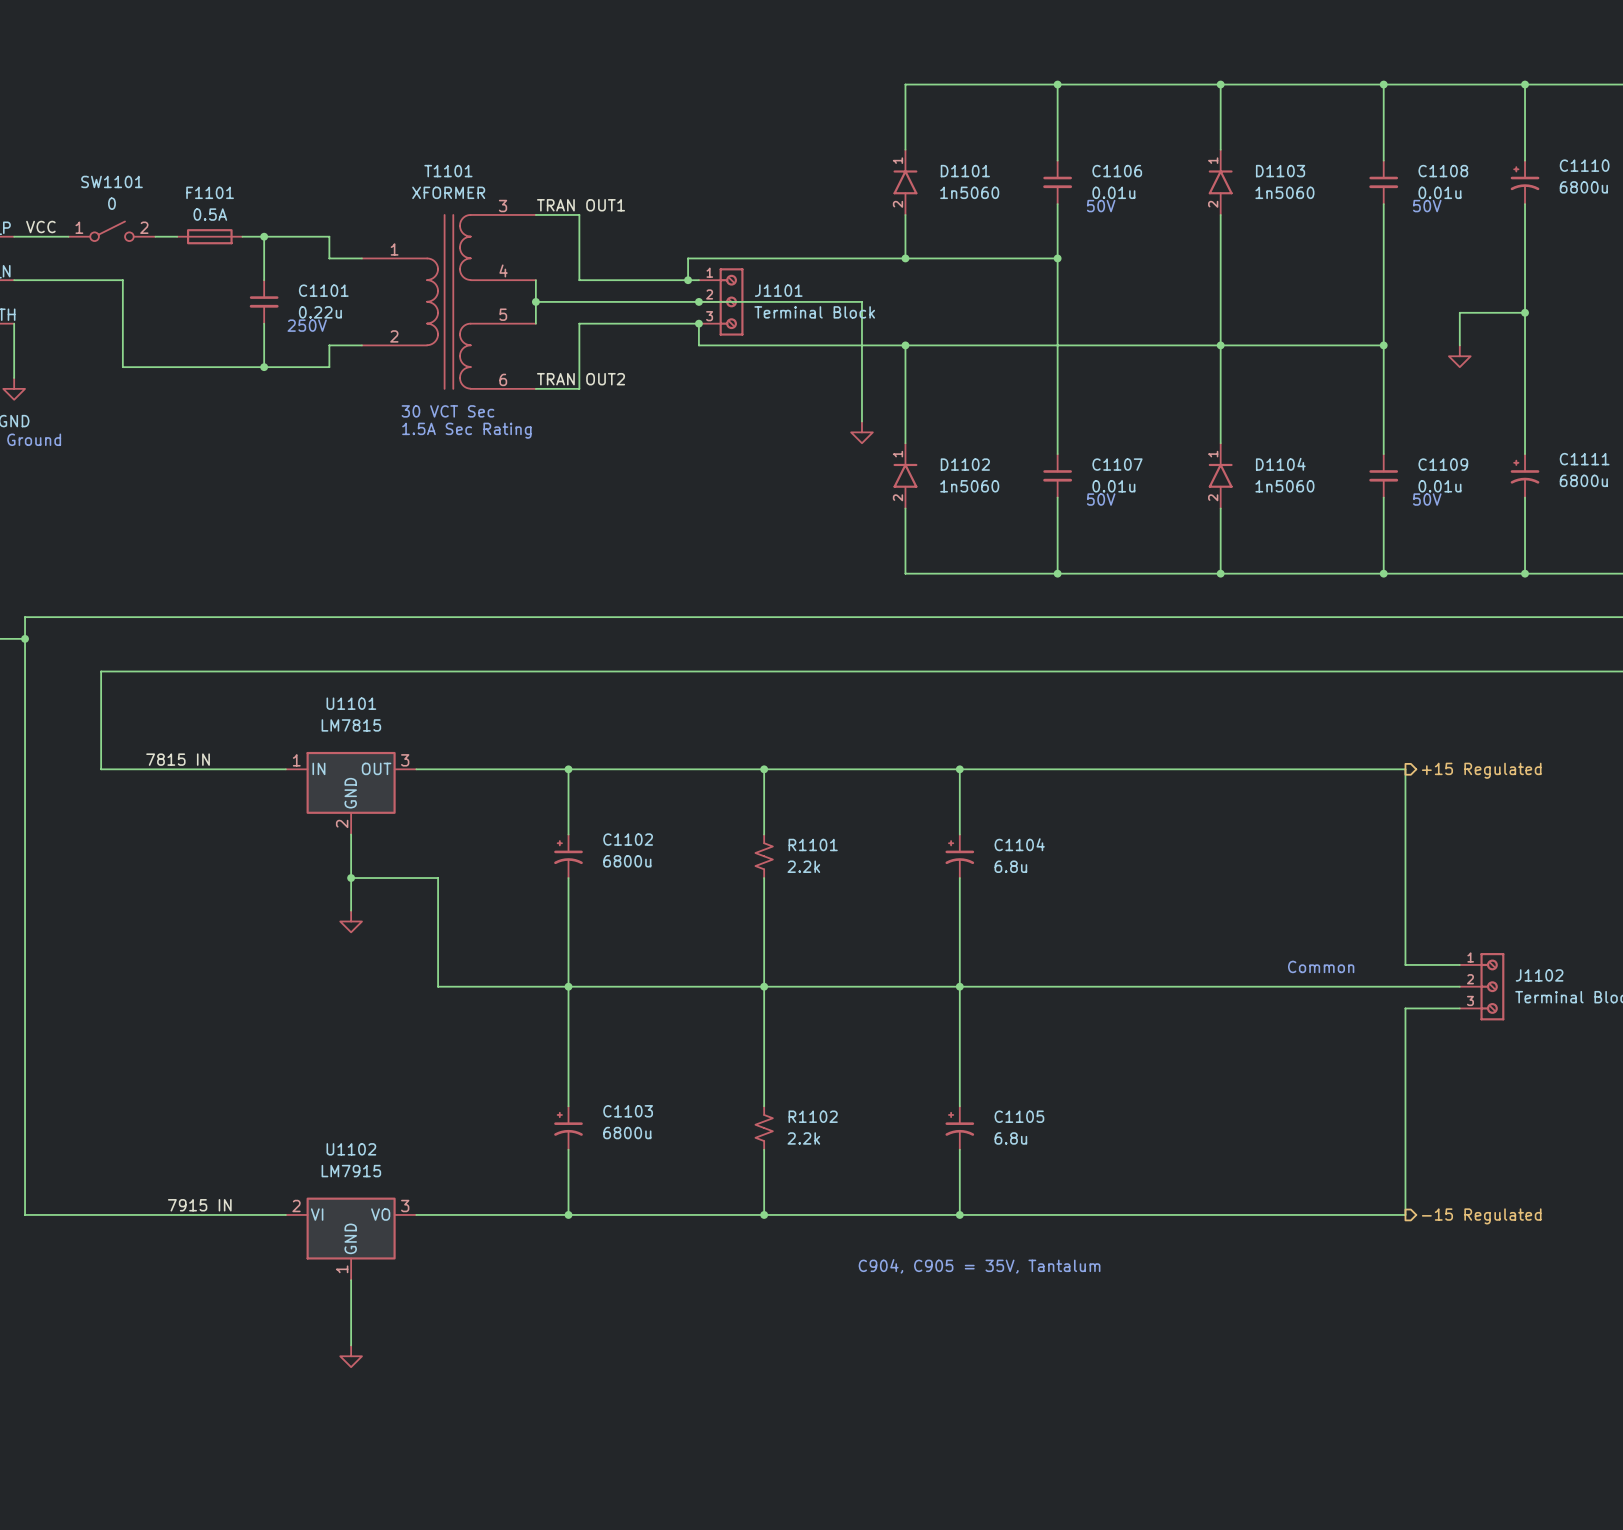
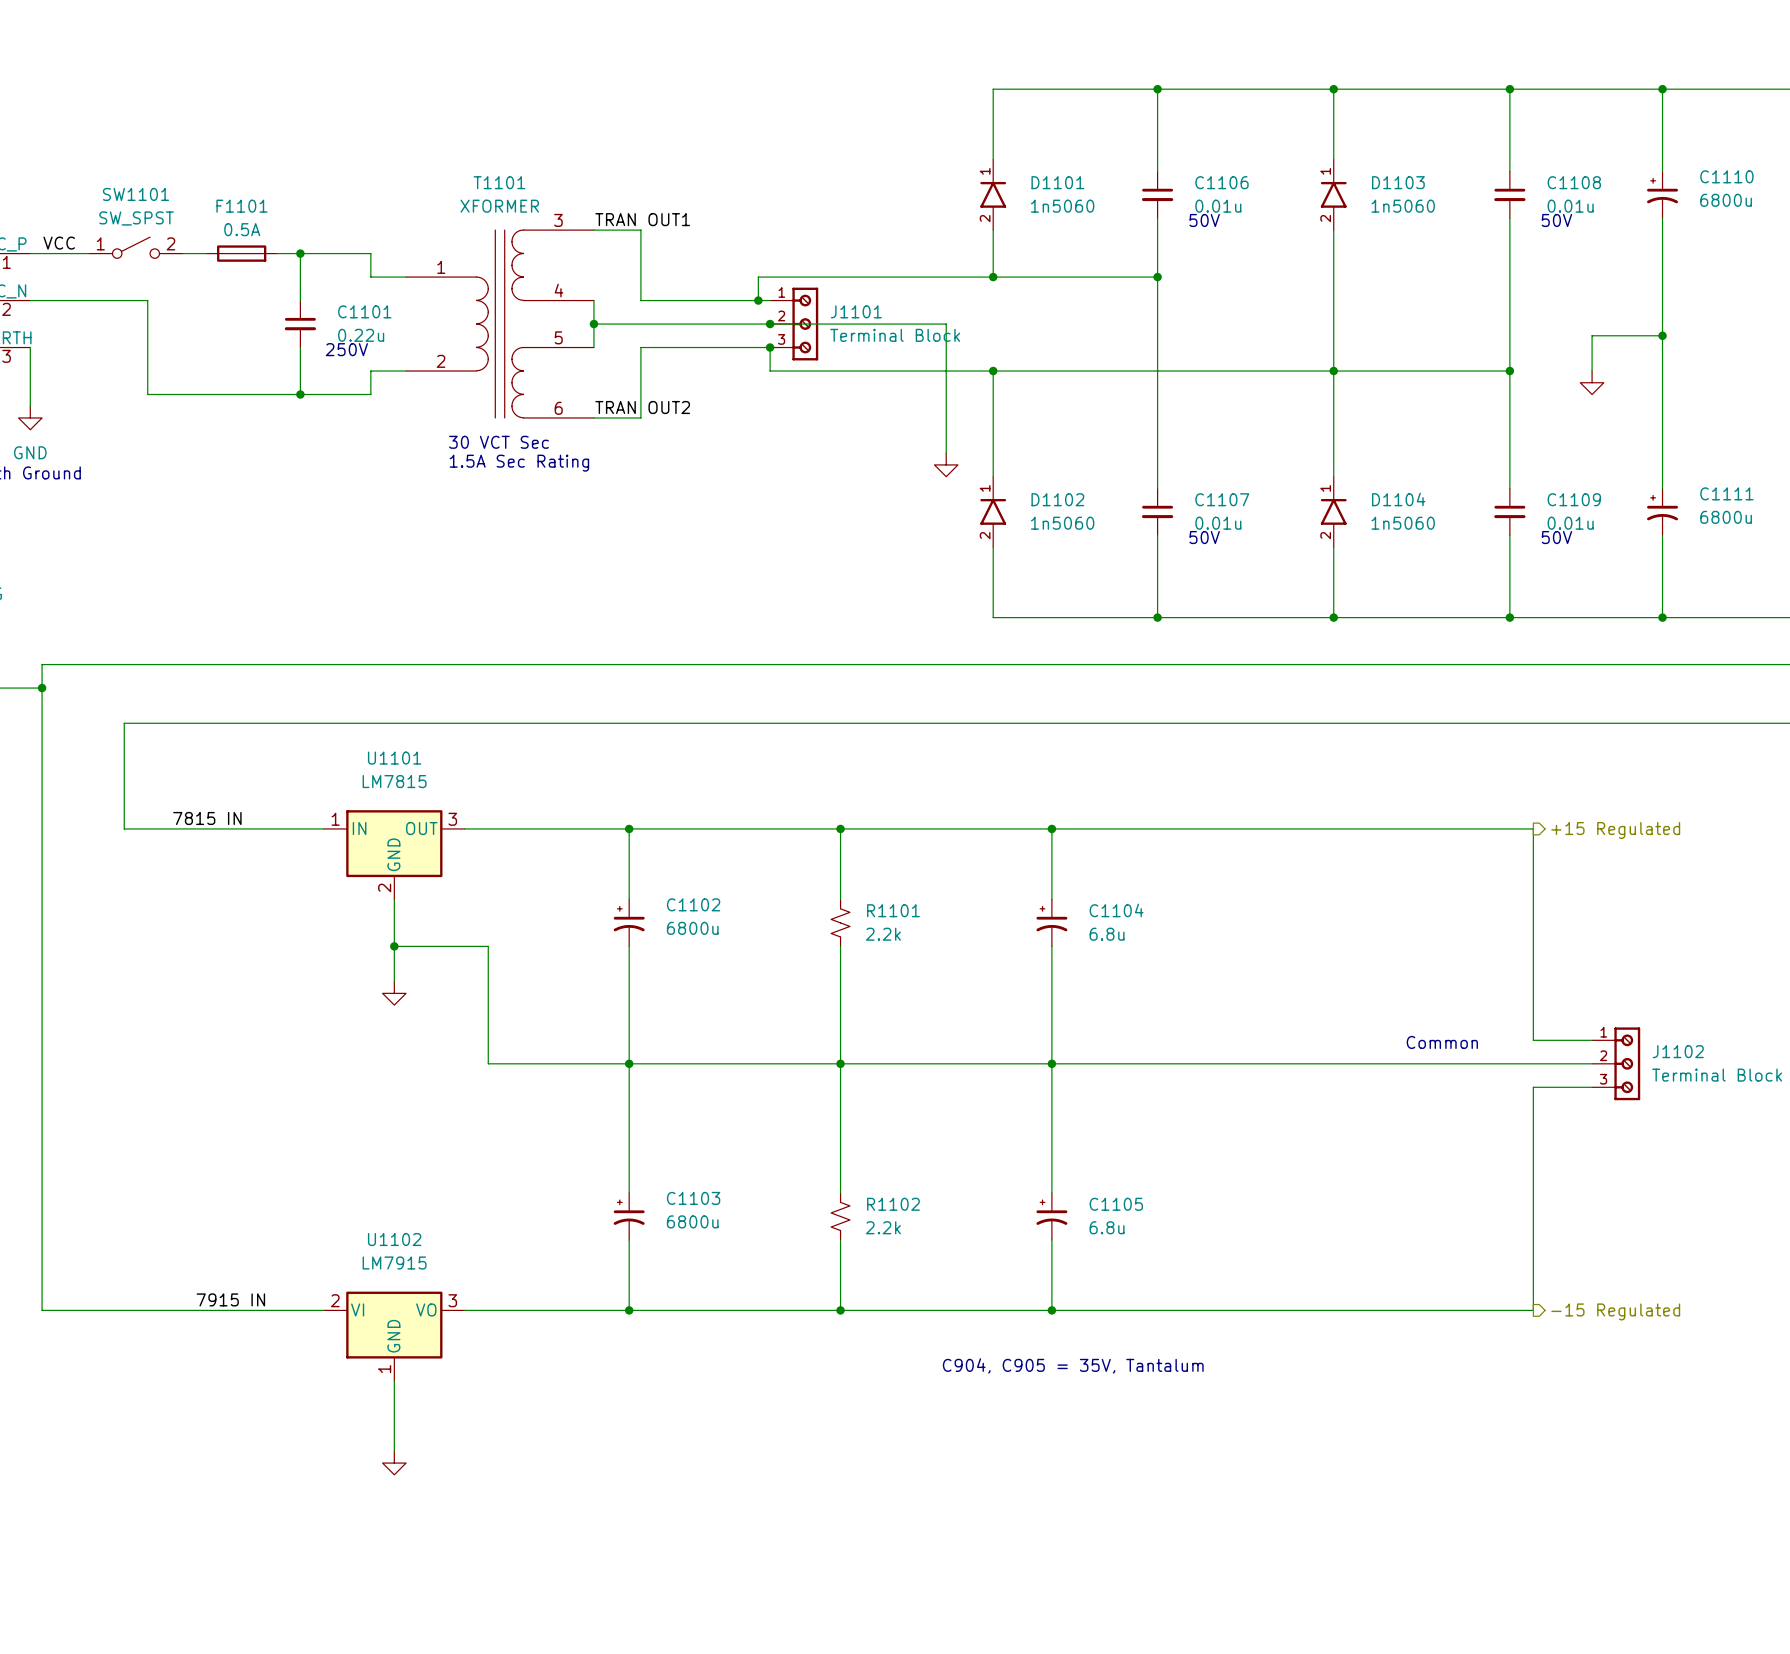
SW1101 value: 0 (111, 203) -> SW_SPST (136, 218)

